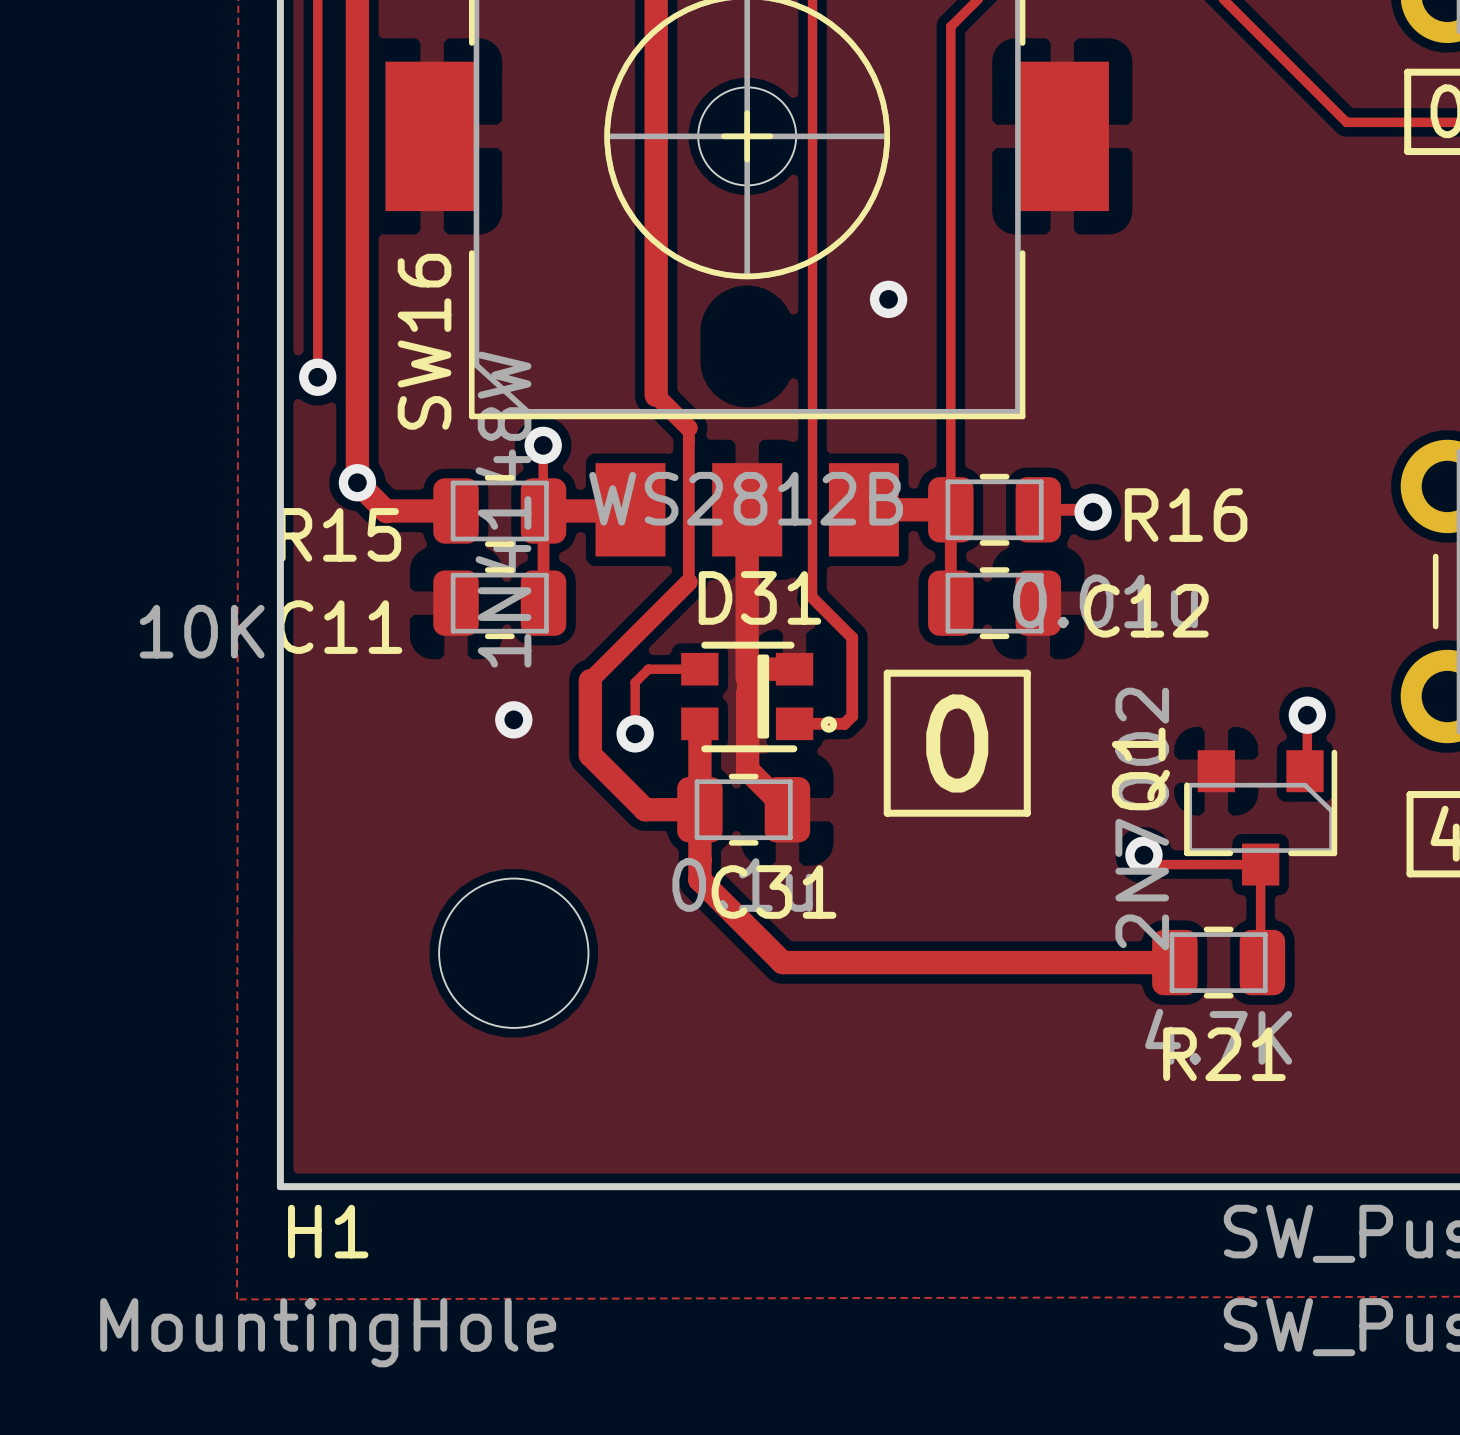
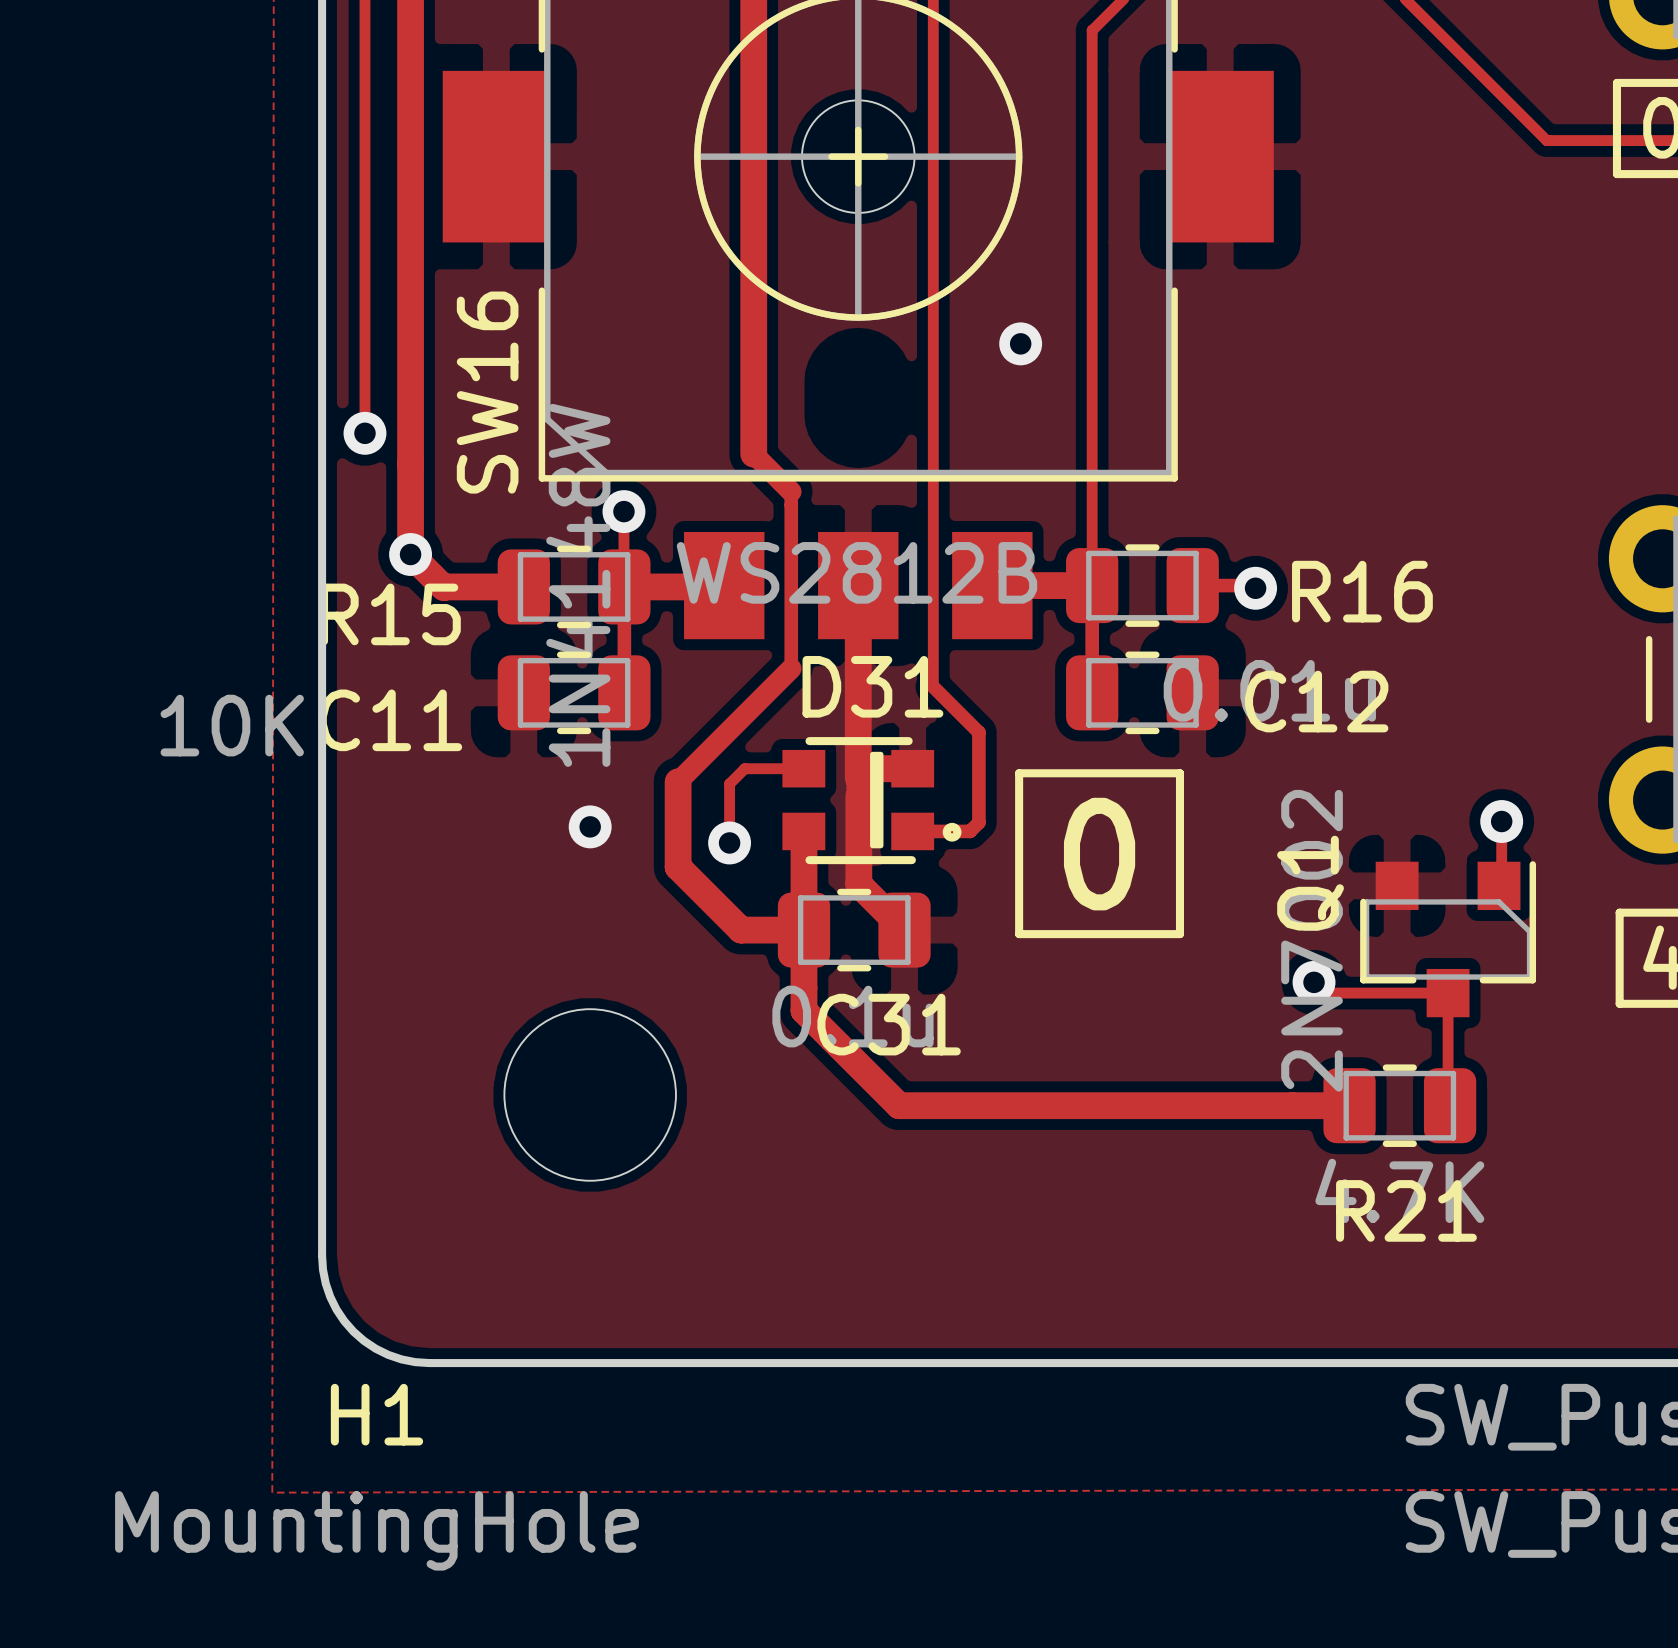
board edge: (280, 1093) (280, 1186) (373, 1186) -> (322, 1255) (325, 1283) (330, 1296) (336, 1309) (353, 1331) (364, 1340) (388, 1354) (415, 1362) (429, 1363)

